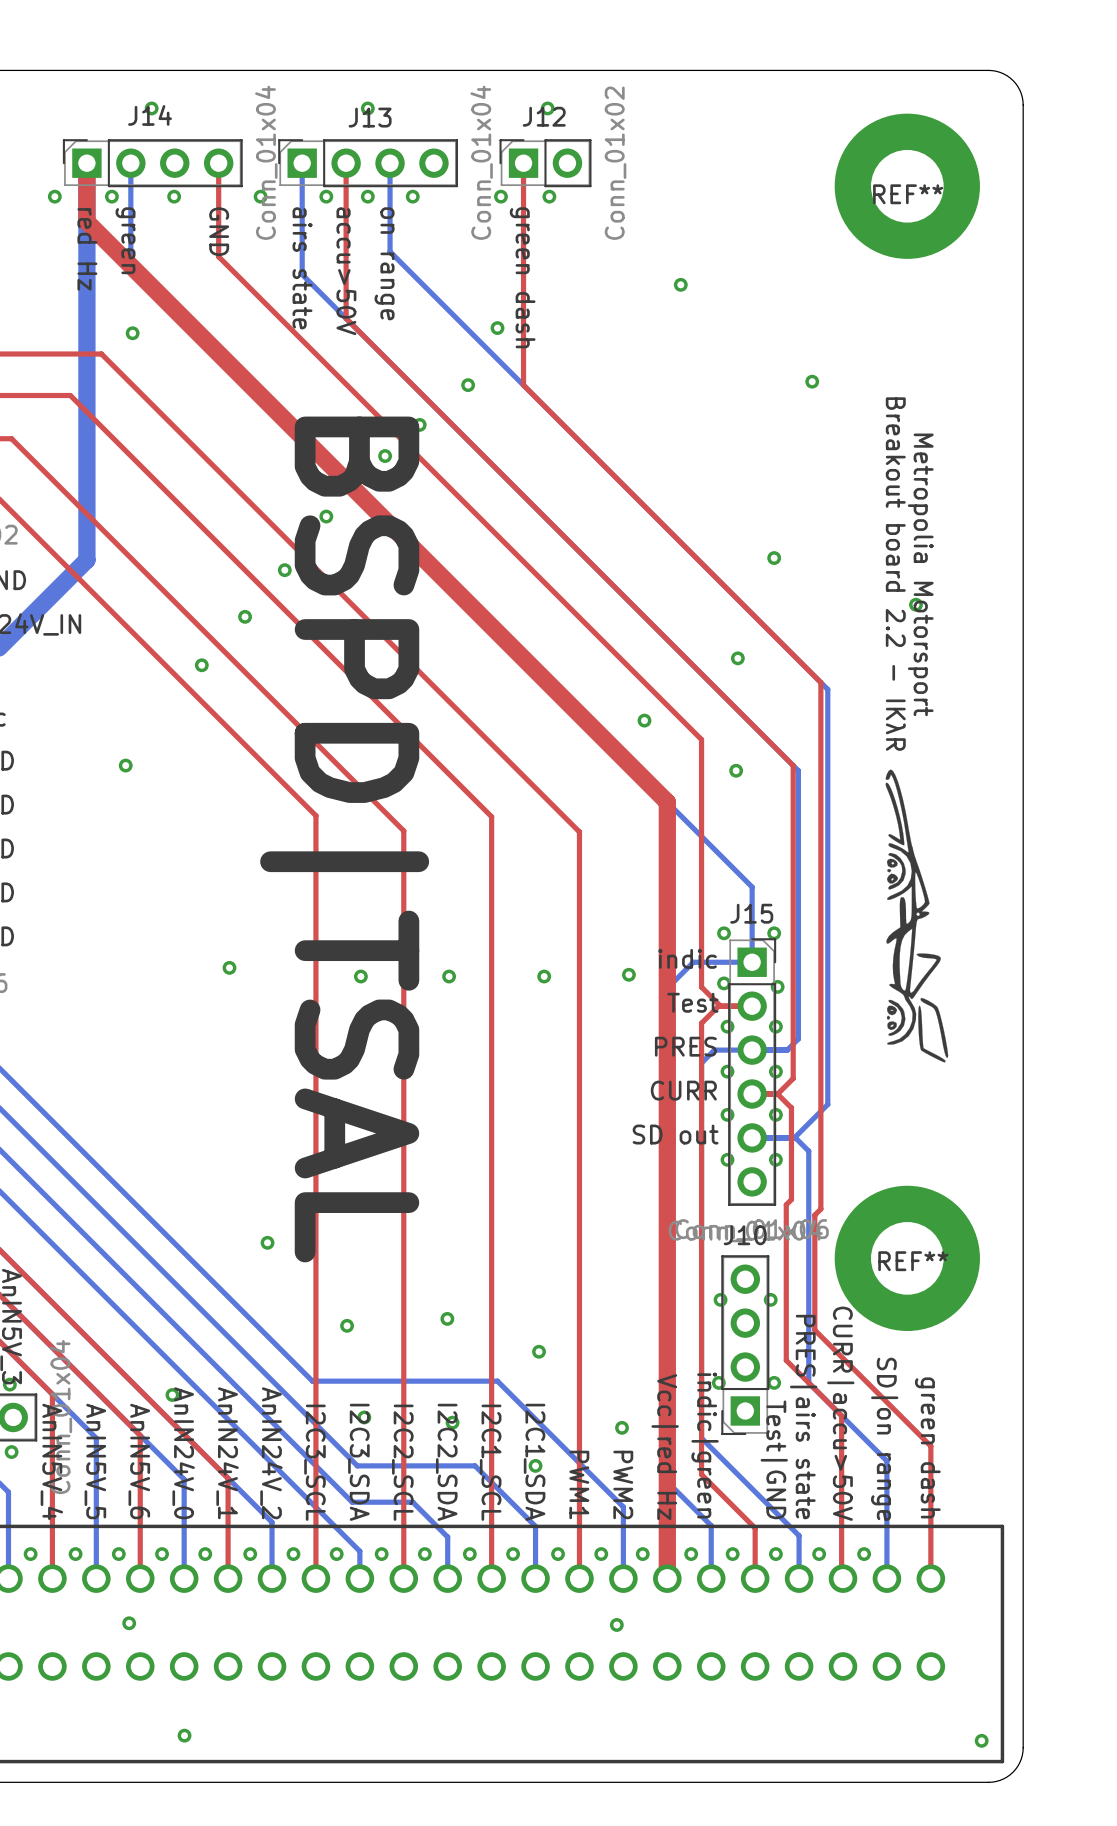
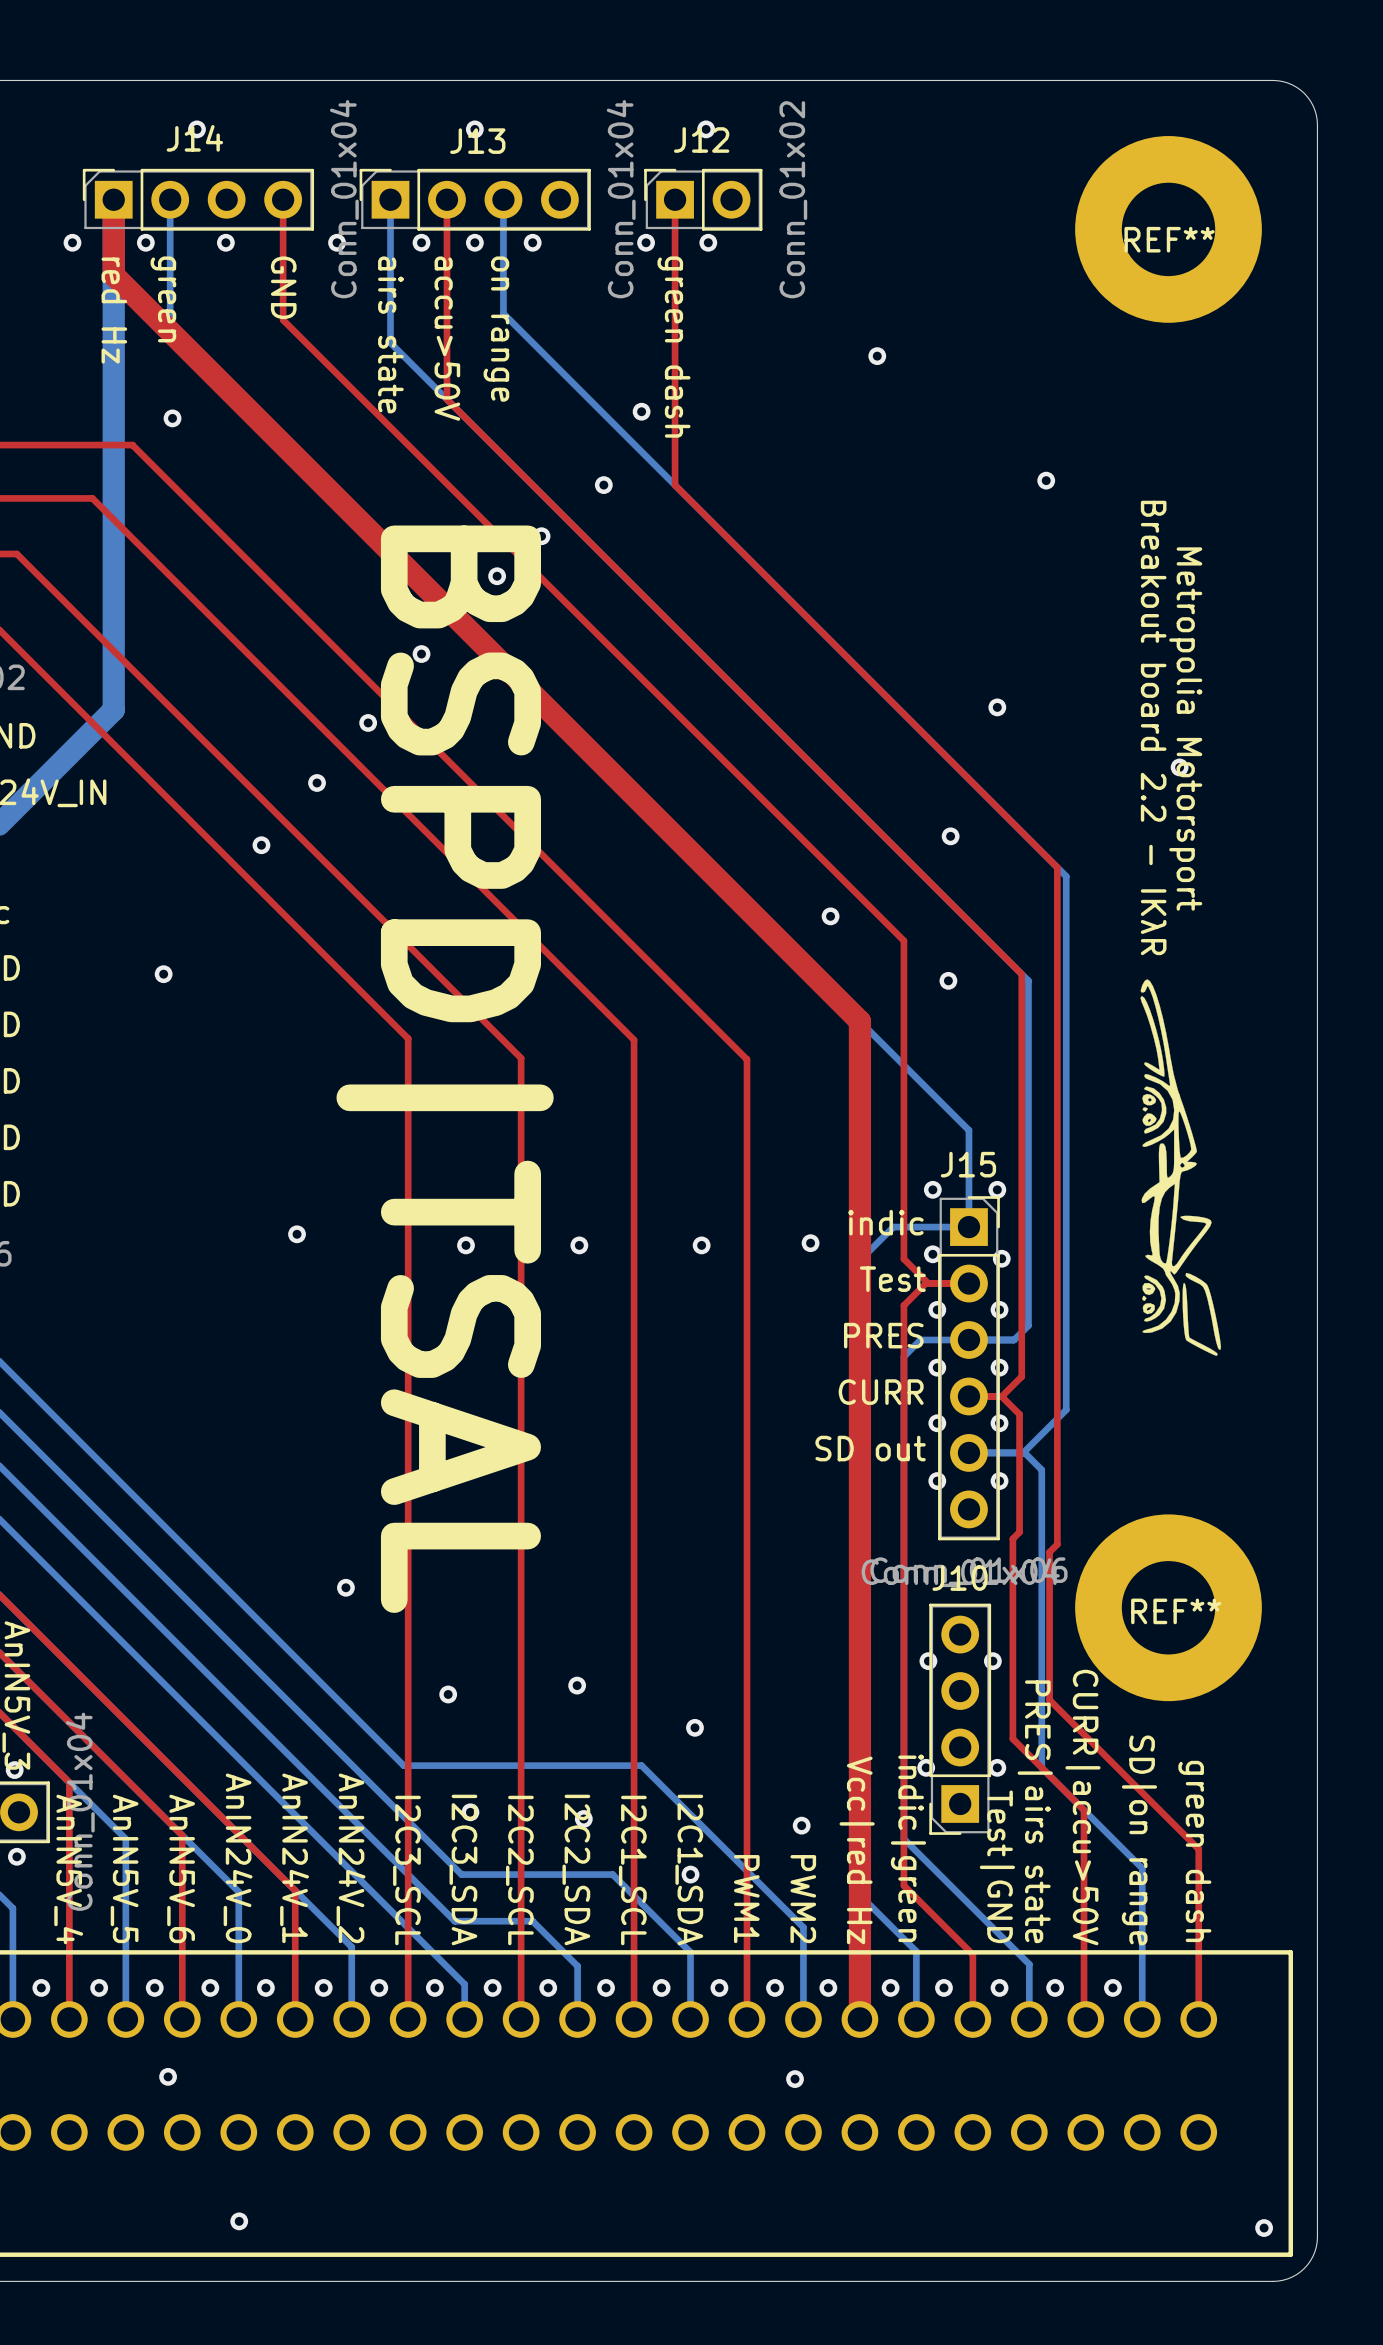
via: (172, 1394) -> none

